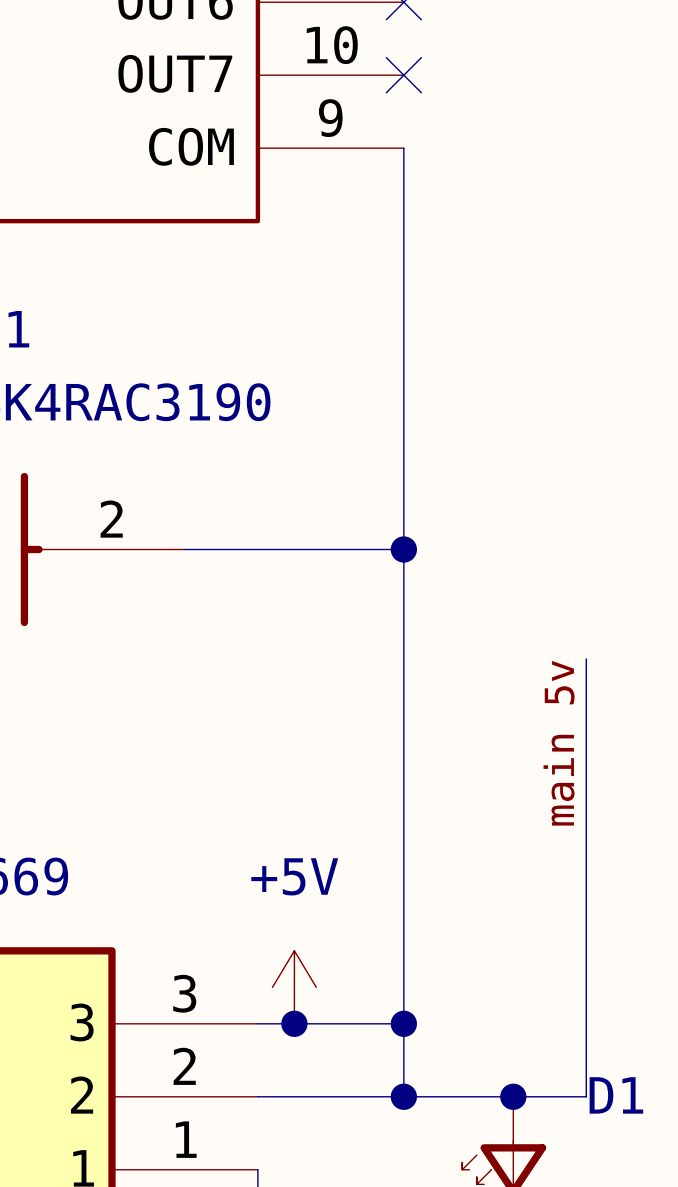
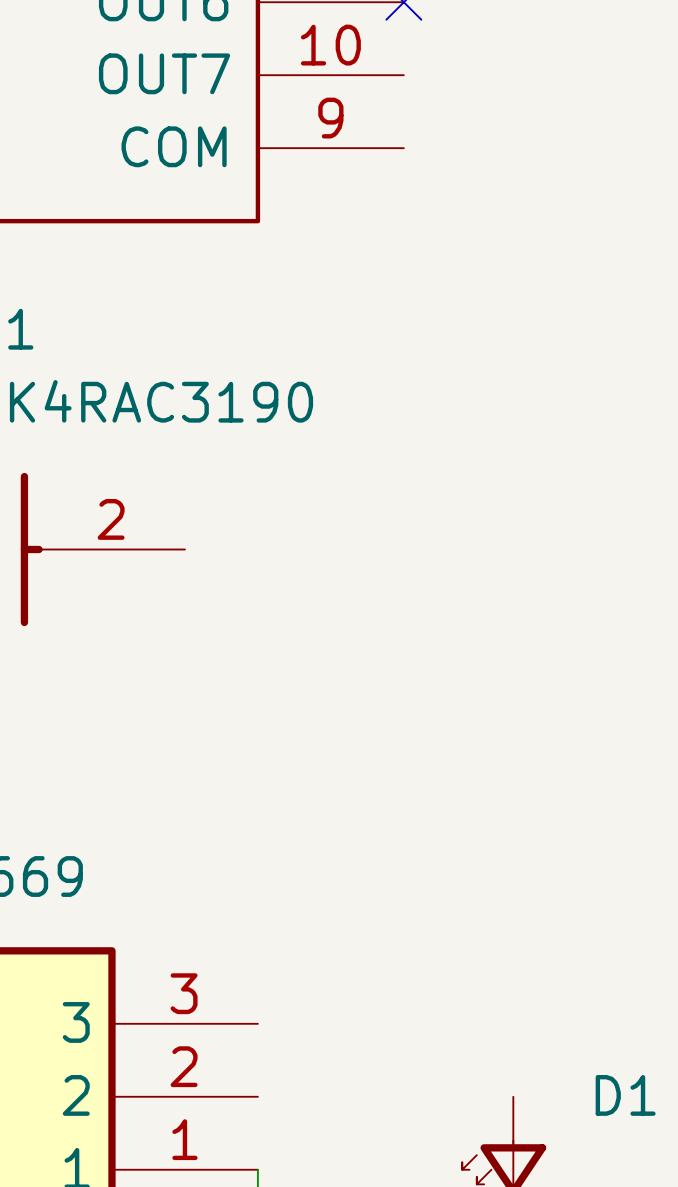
no-connect mark: (403, 75) -> none
wire: (403, 148) (403, 1096) -> none
wire: (184, 549) (403, 549) -> none
junction: (403, 549) -> none
wire: (586, 658) (586, 1096) (257, 1096) -> none
label: main 5v (559, 743) -> none
power symbol: +5V (294, 987) -> none
wire: (257, 1023) (403, 1023) -> none
junction: (294, 1023) -> none
junction: (403, 1023) -> none
junction: (403, 1096) -> none
junction: (513, 1096) -> none

